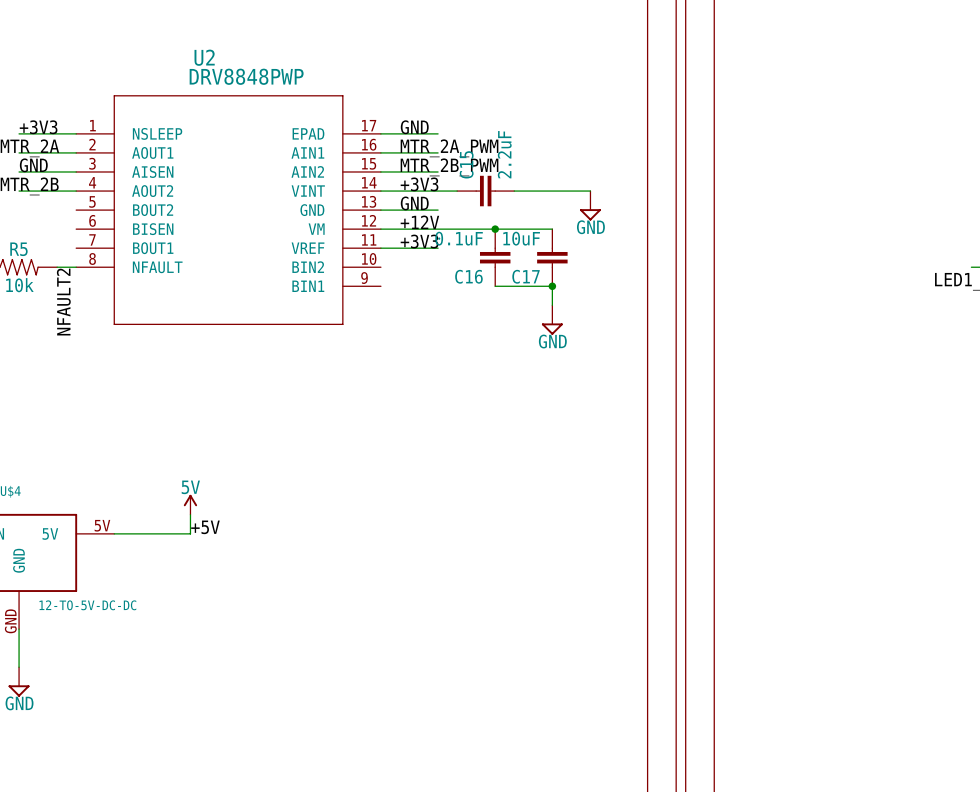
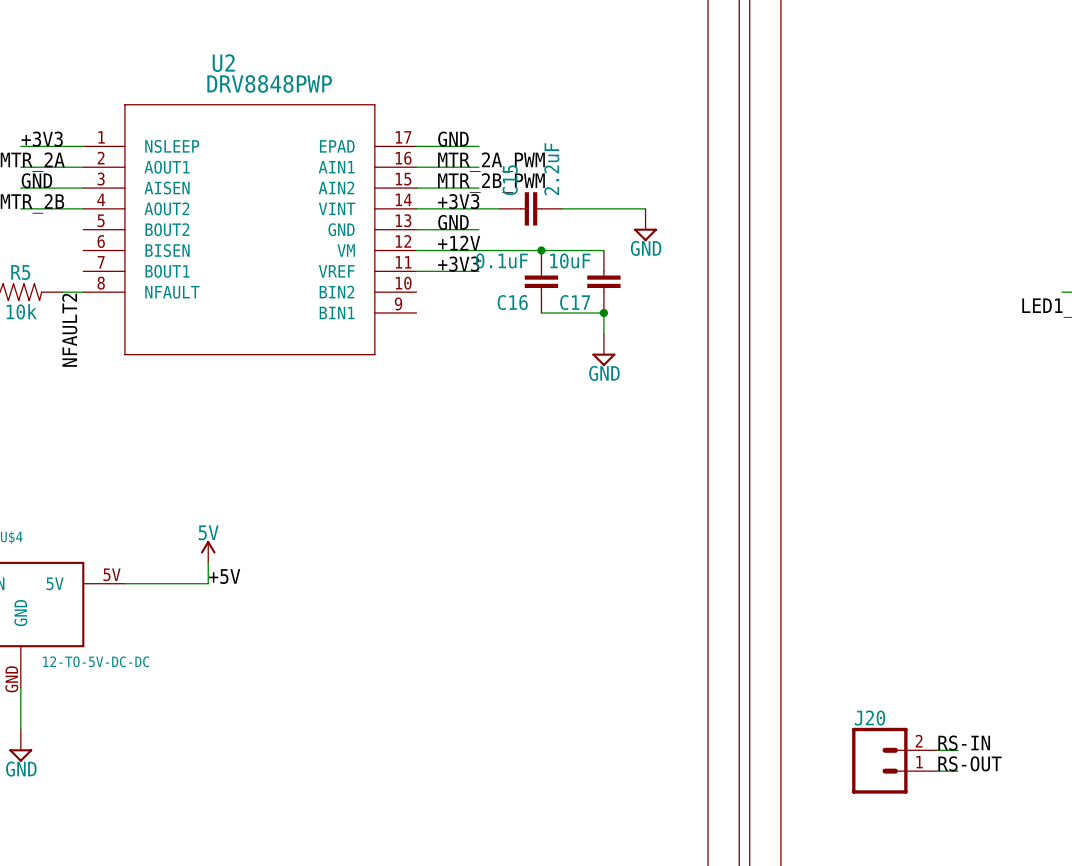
label: none -> RS-IN (964, 743)
wire: none -> (937, 750) (957, 750)
J20: none -> (894, 760)
label: none -> RS-OUT (970, 763)
wire: none -> (937, 771) (957, 771)

